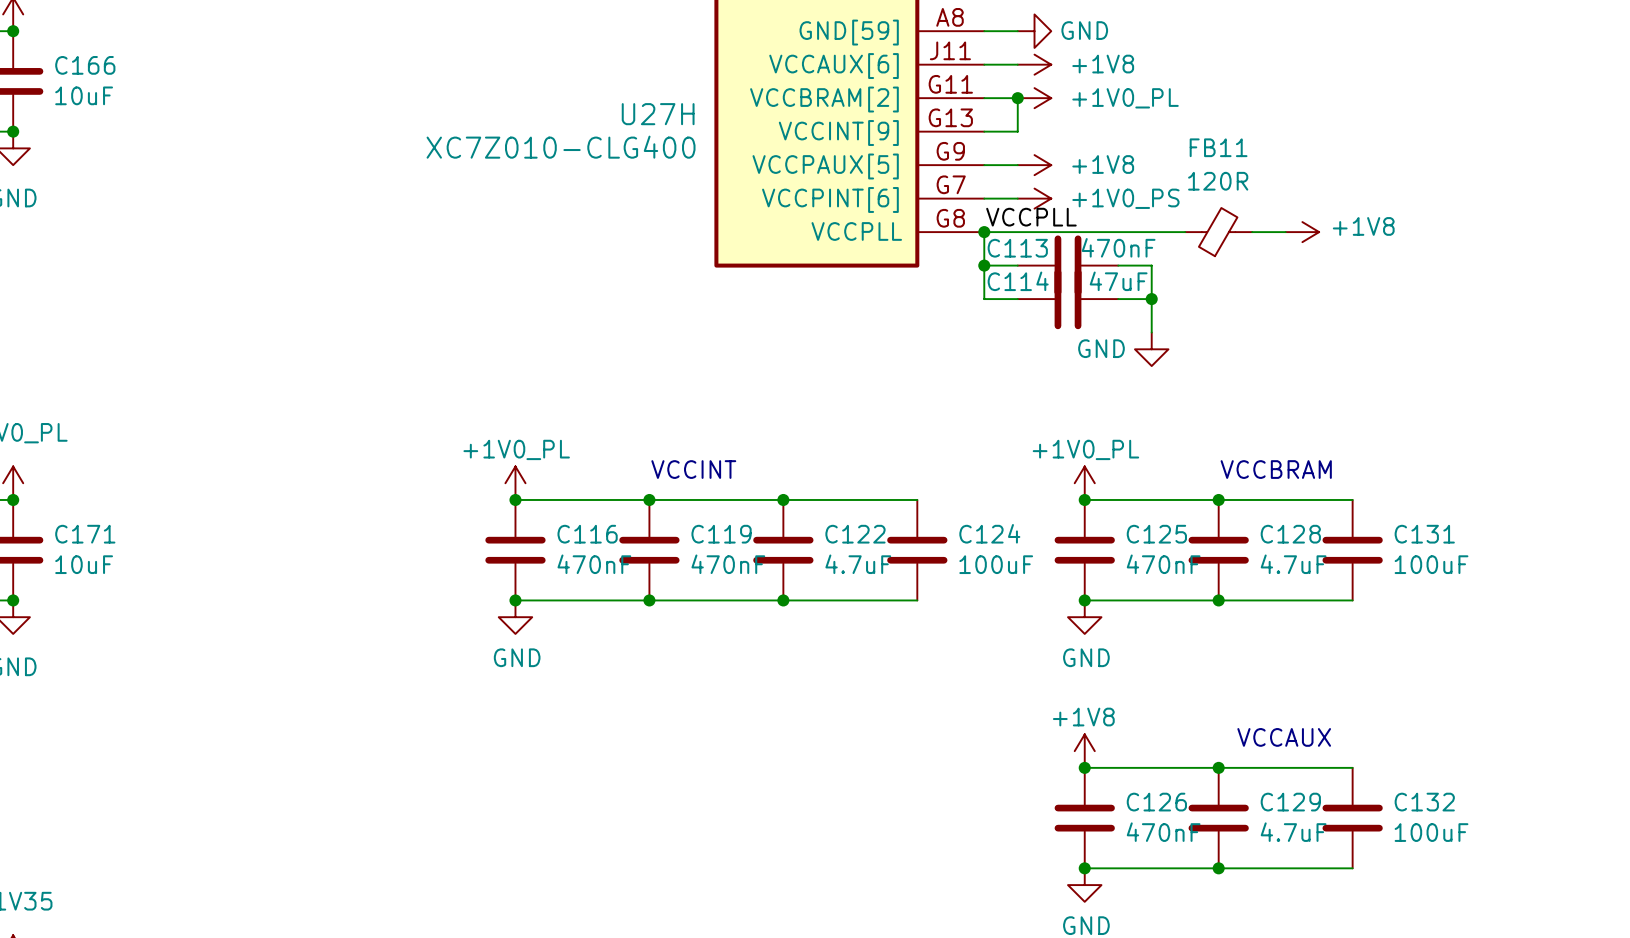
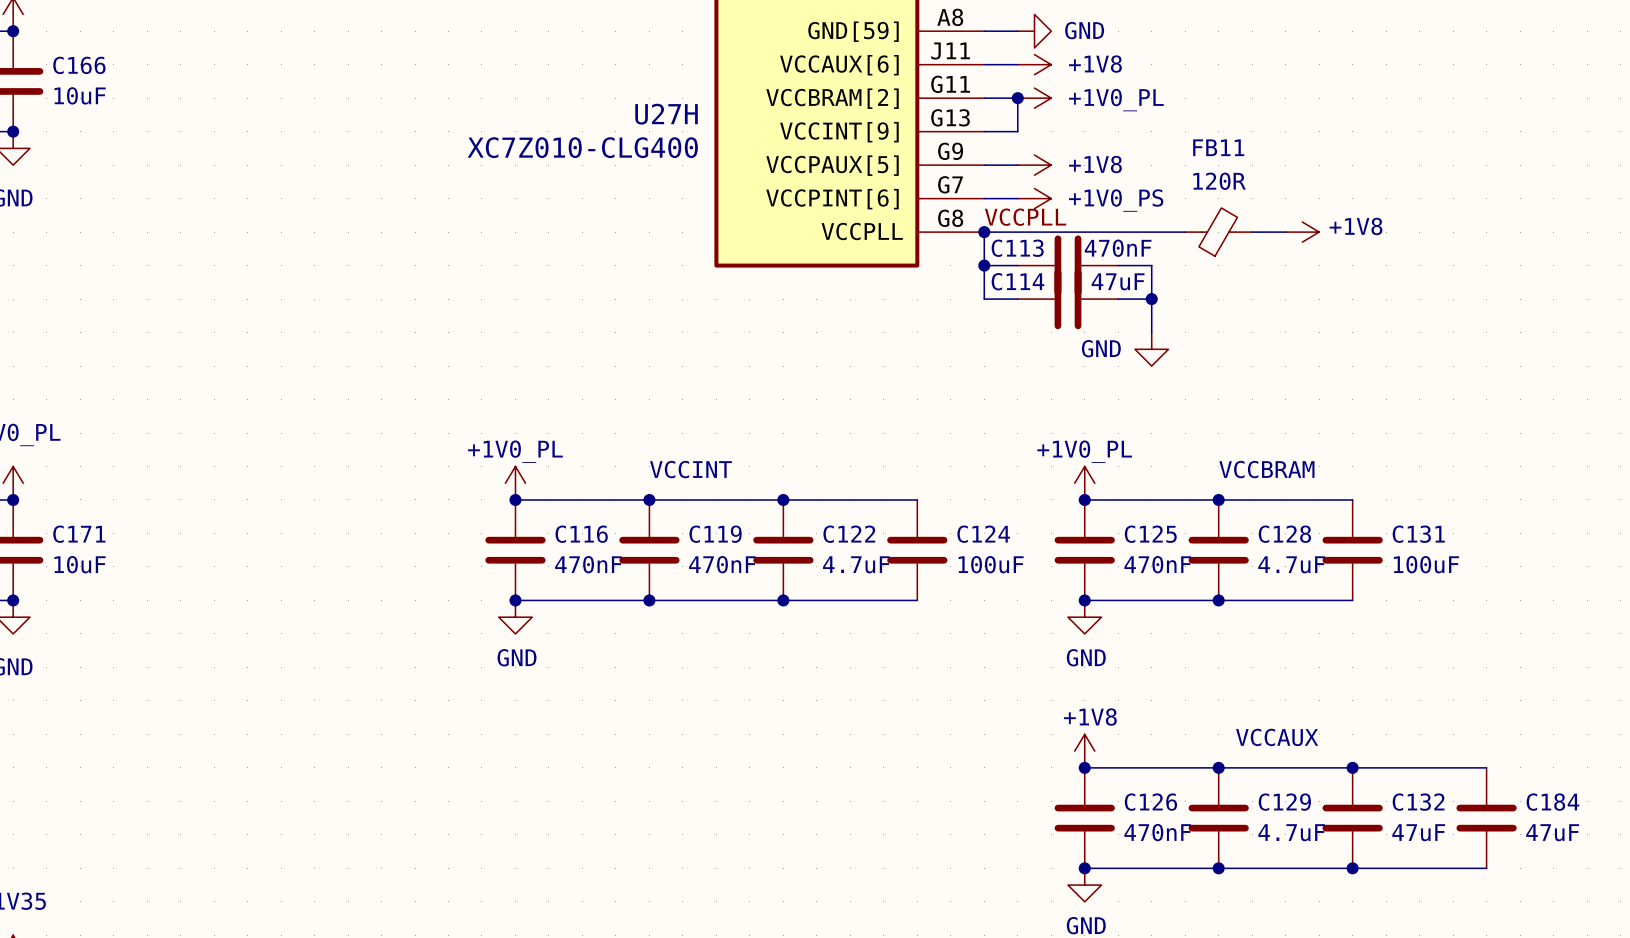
wire: none -> (1352, 767) (1486, 767)
junction: none -> (1352, 767)
C184: none -> 47uF (1486, 818)
C132 value: 100uF (1431, 832) -> 47uF (1418, 832)
wire: none -> (1352, 868) (1486, 868)
junction: none -> (1352, 868)

